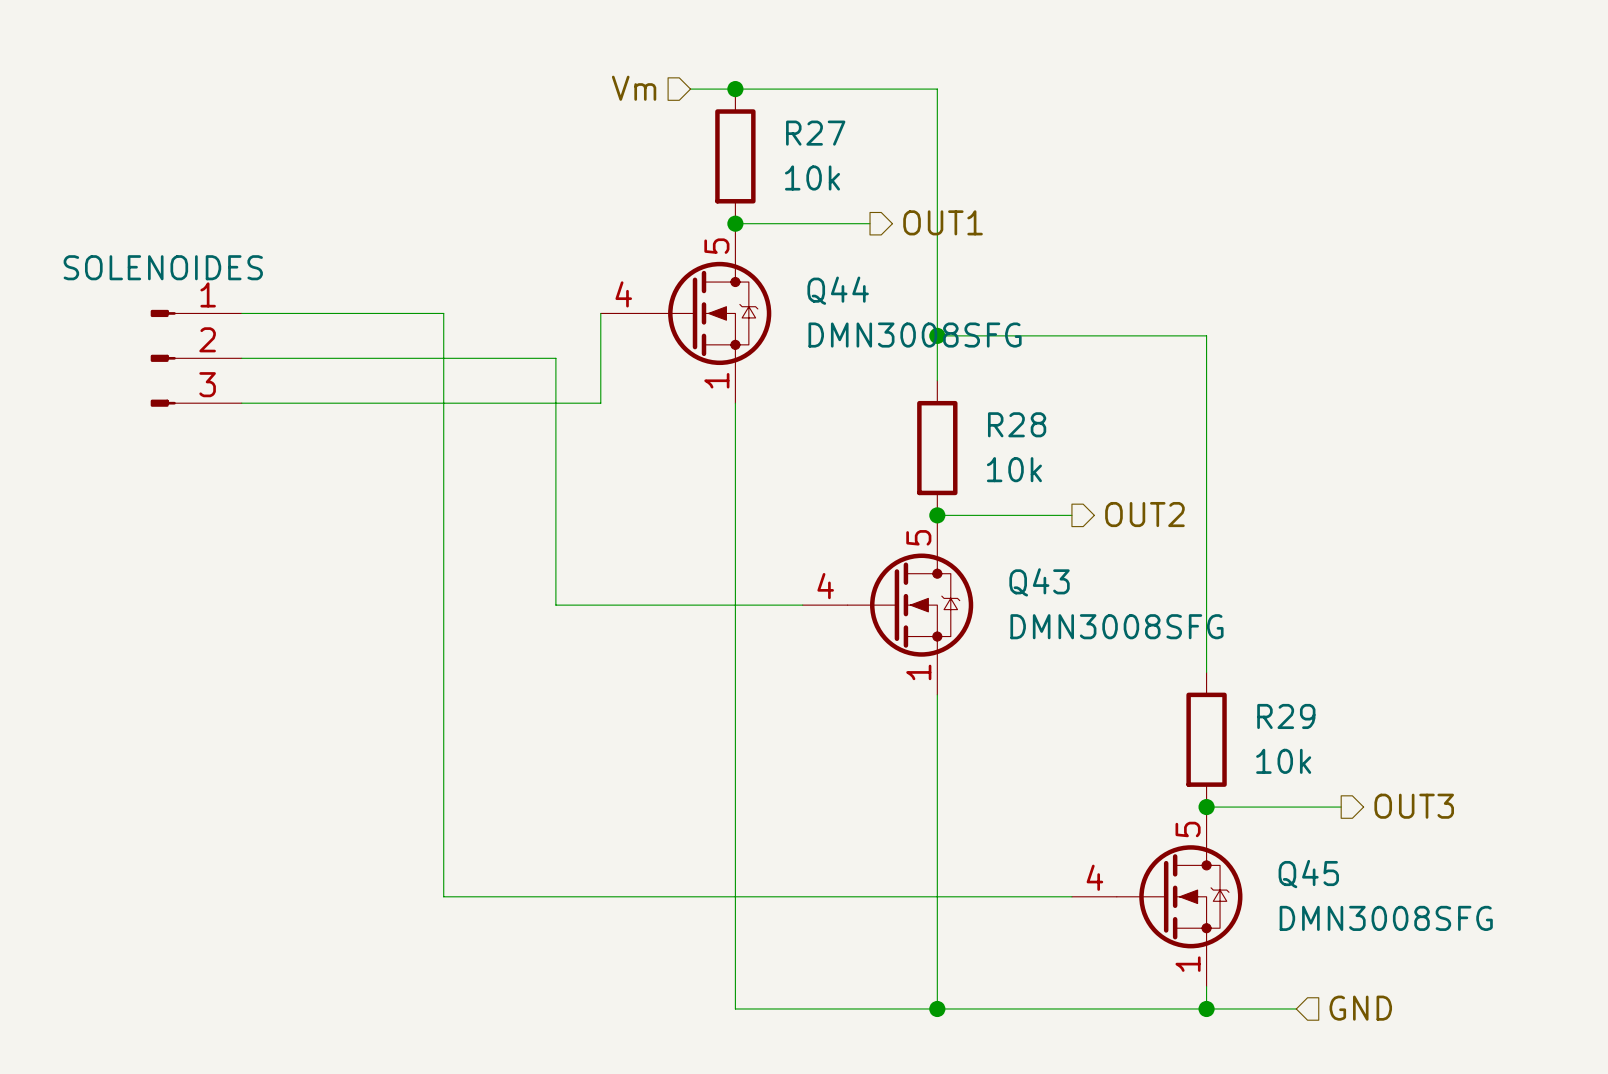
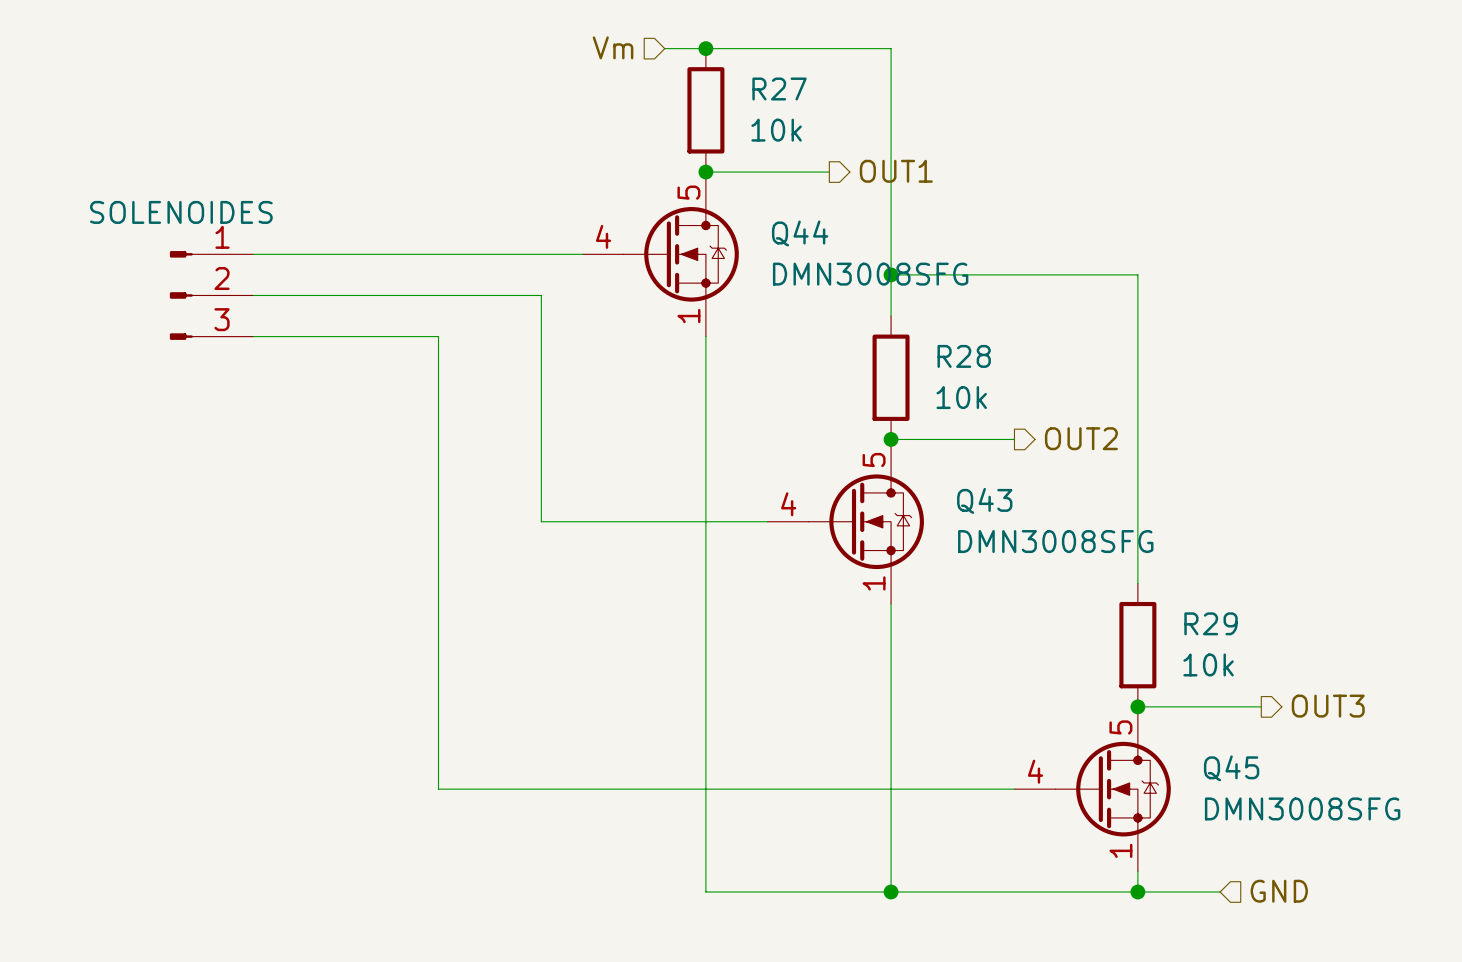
wire: (443, 313) (443, 403) (600, 403) (600, 313) -> (438, 254) (582, 254)

